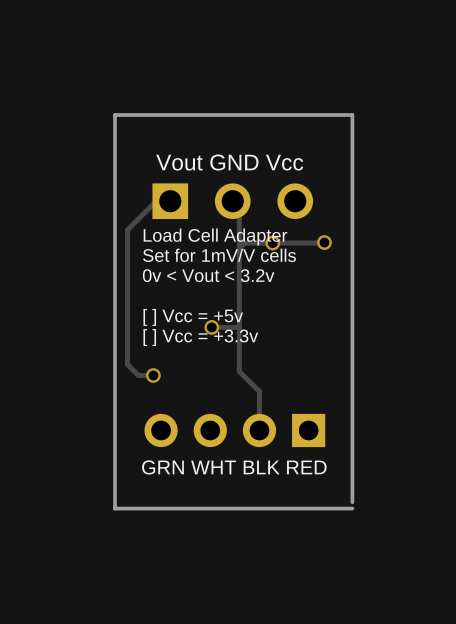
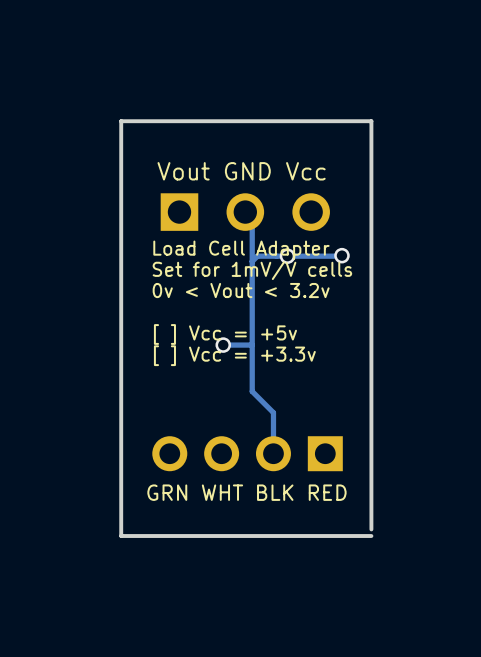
track: (170, 201) (156, 201) (127, 229) (127, 364) (138, 375) (153, 375) -> none
via: (153, 375) -> none

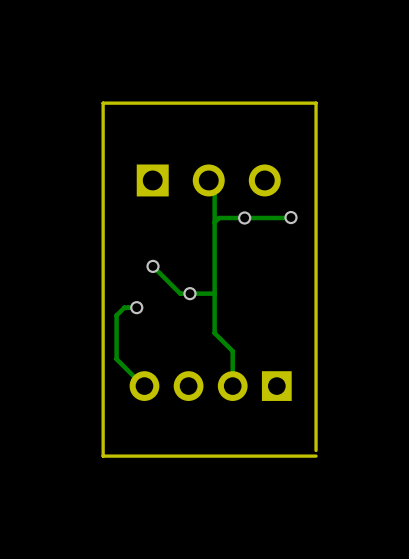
text: Vout GND Vcc (241, 171) -> none
text: Load Cell Adapter (241, 250) -> none
text: Set for 1mV/V cells (252, 270) -> none
text: 0v < Vout < 3.2v (241, 290) -> none
track: none -> (153, 266) (180, 293) (189, 293)
via: none -> (153, 266)
text: [ ] Vcc = +5v (225, 334) -> none
text: [ ] Vcc = +3.3v (234, 355) -> none
track: none -> (136, 307) (124, 307) (116, 315) (116, 359) (143, 386)
via: none -> (136, 307)
text: GRN WHT BLK RED (246, 492) -> none

